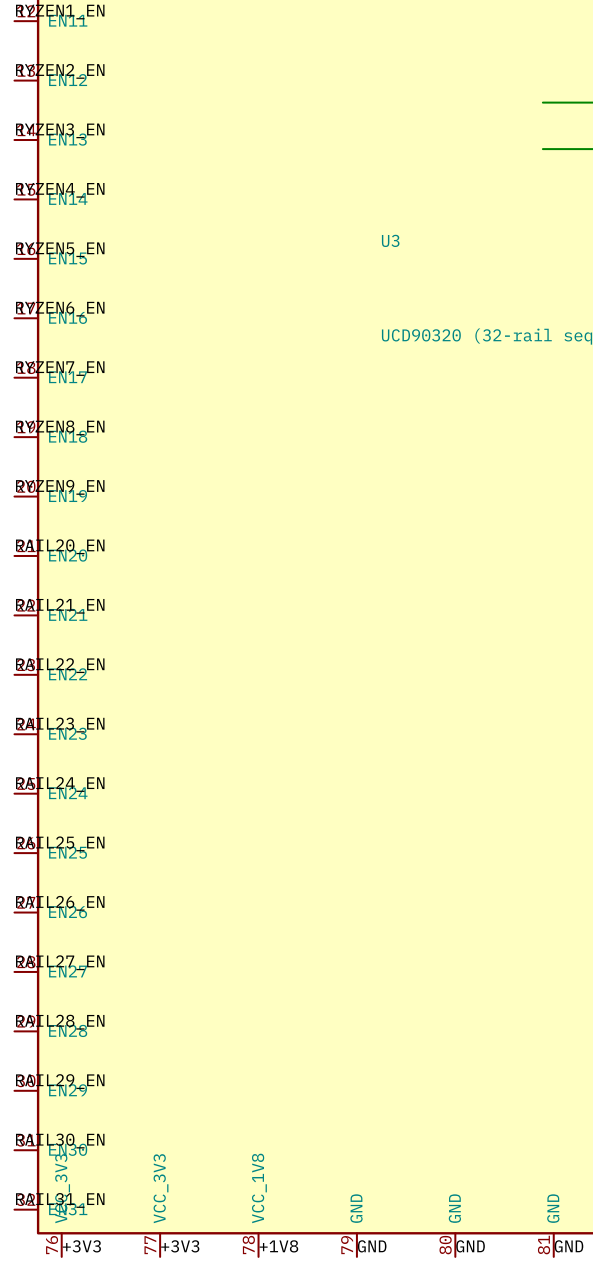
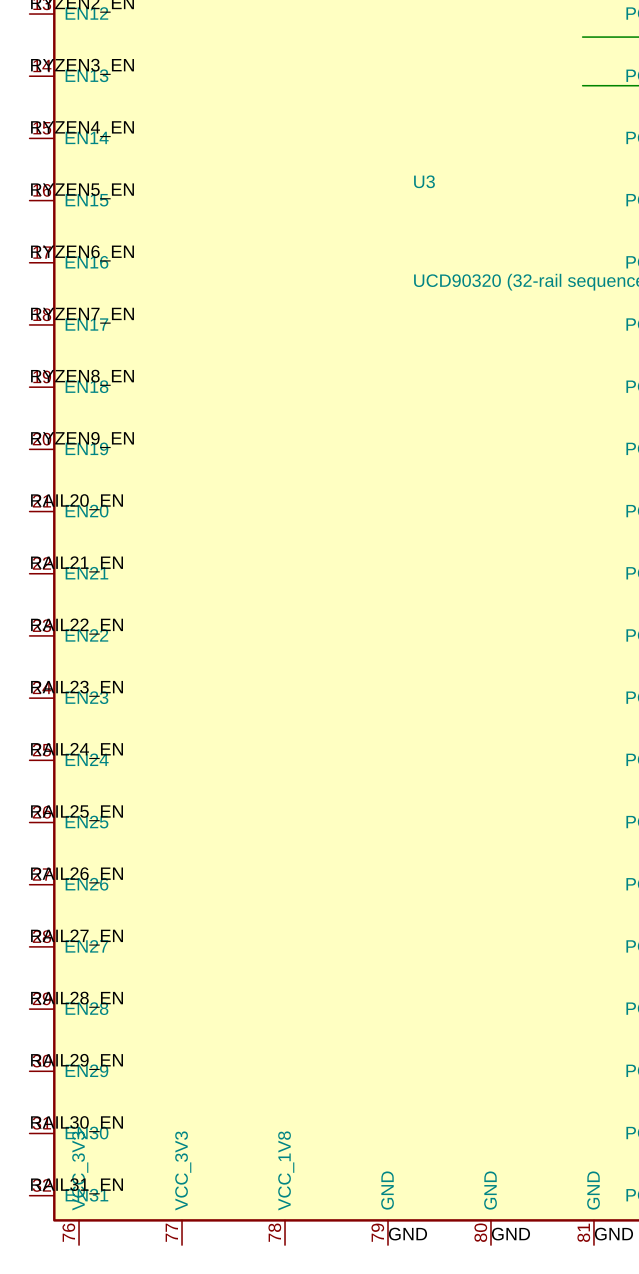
label: +3V3 (81, 1246) -> none
label: +3V3 (180, 1246) -> none
label: +1V8 (278, 1246) -> none

